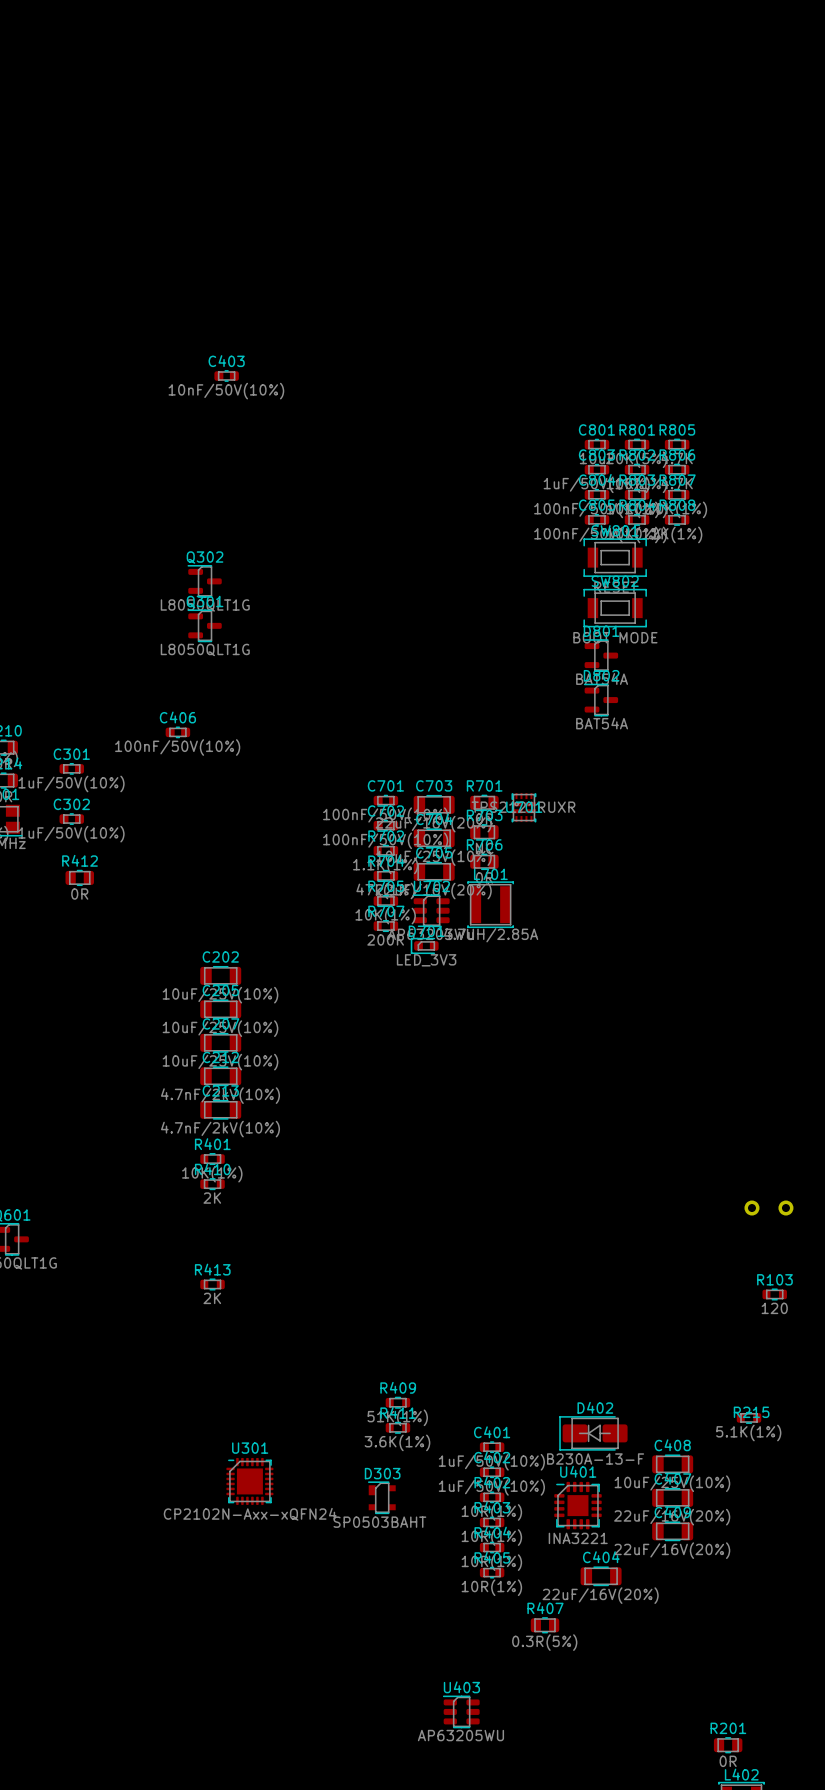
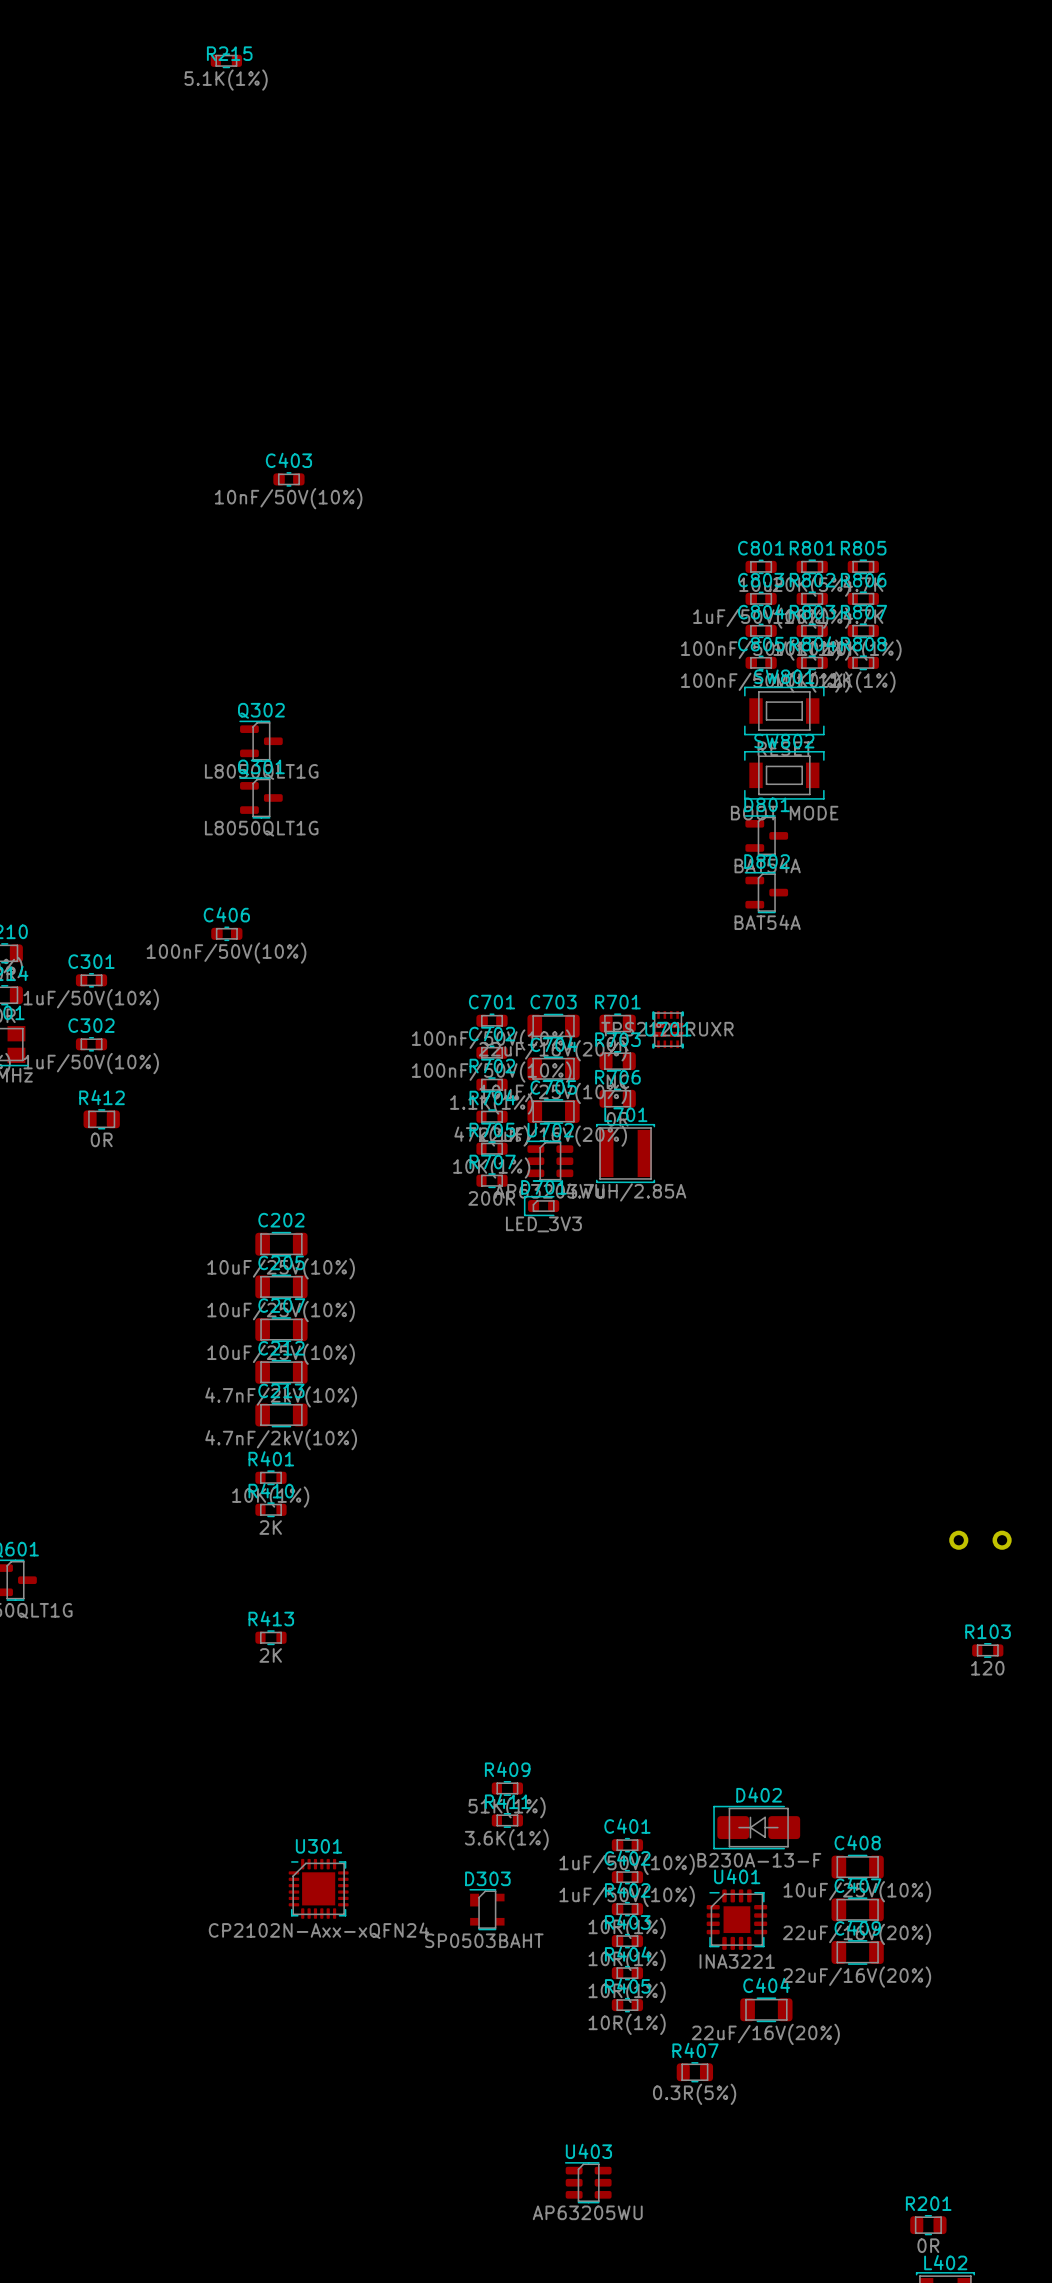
R215 position: (749, 1417) -> (226, 60)

